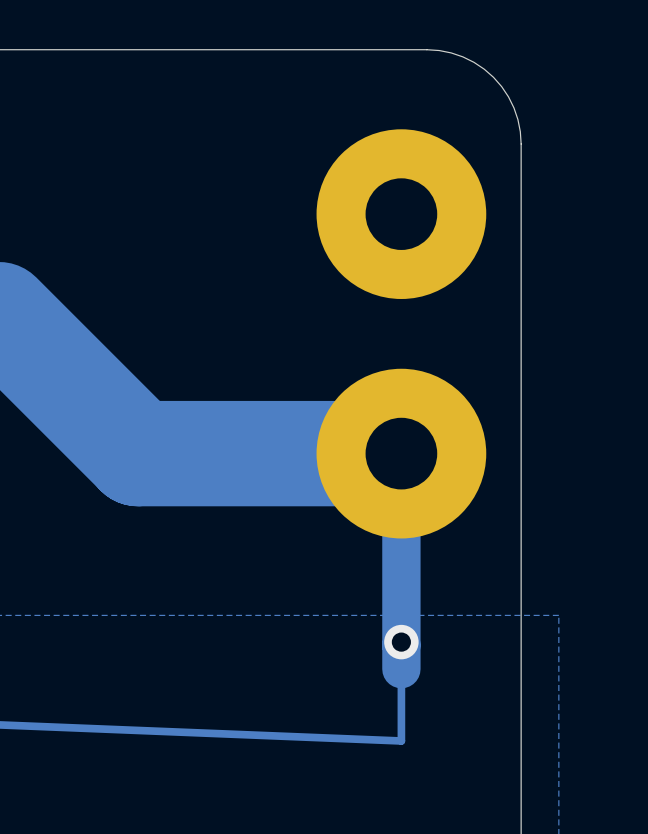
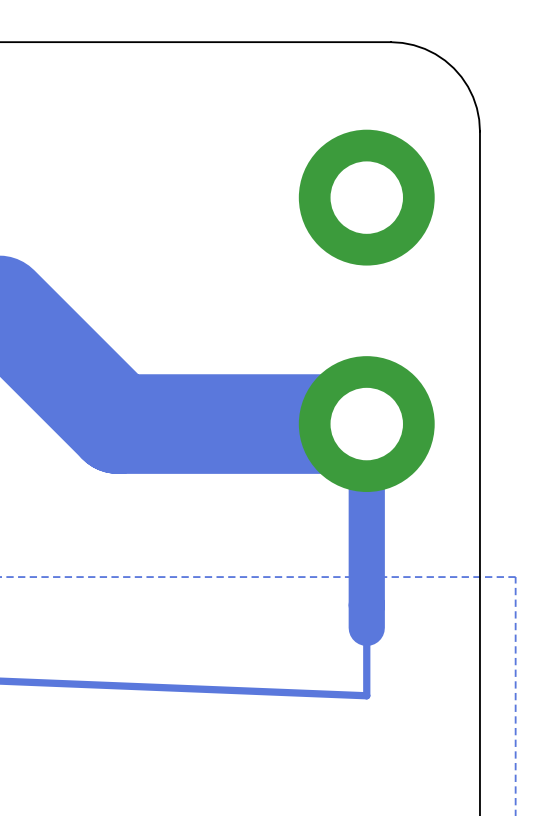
part footprint: [316, 129, 487, 299] -> [298, 129, 435, 266]
part footprint: [316, 368, 487, 539] -> [298, 356, 435, 492]
via: (401, 642) -> none

